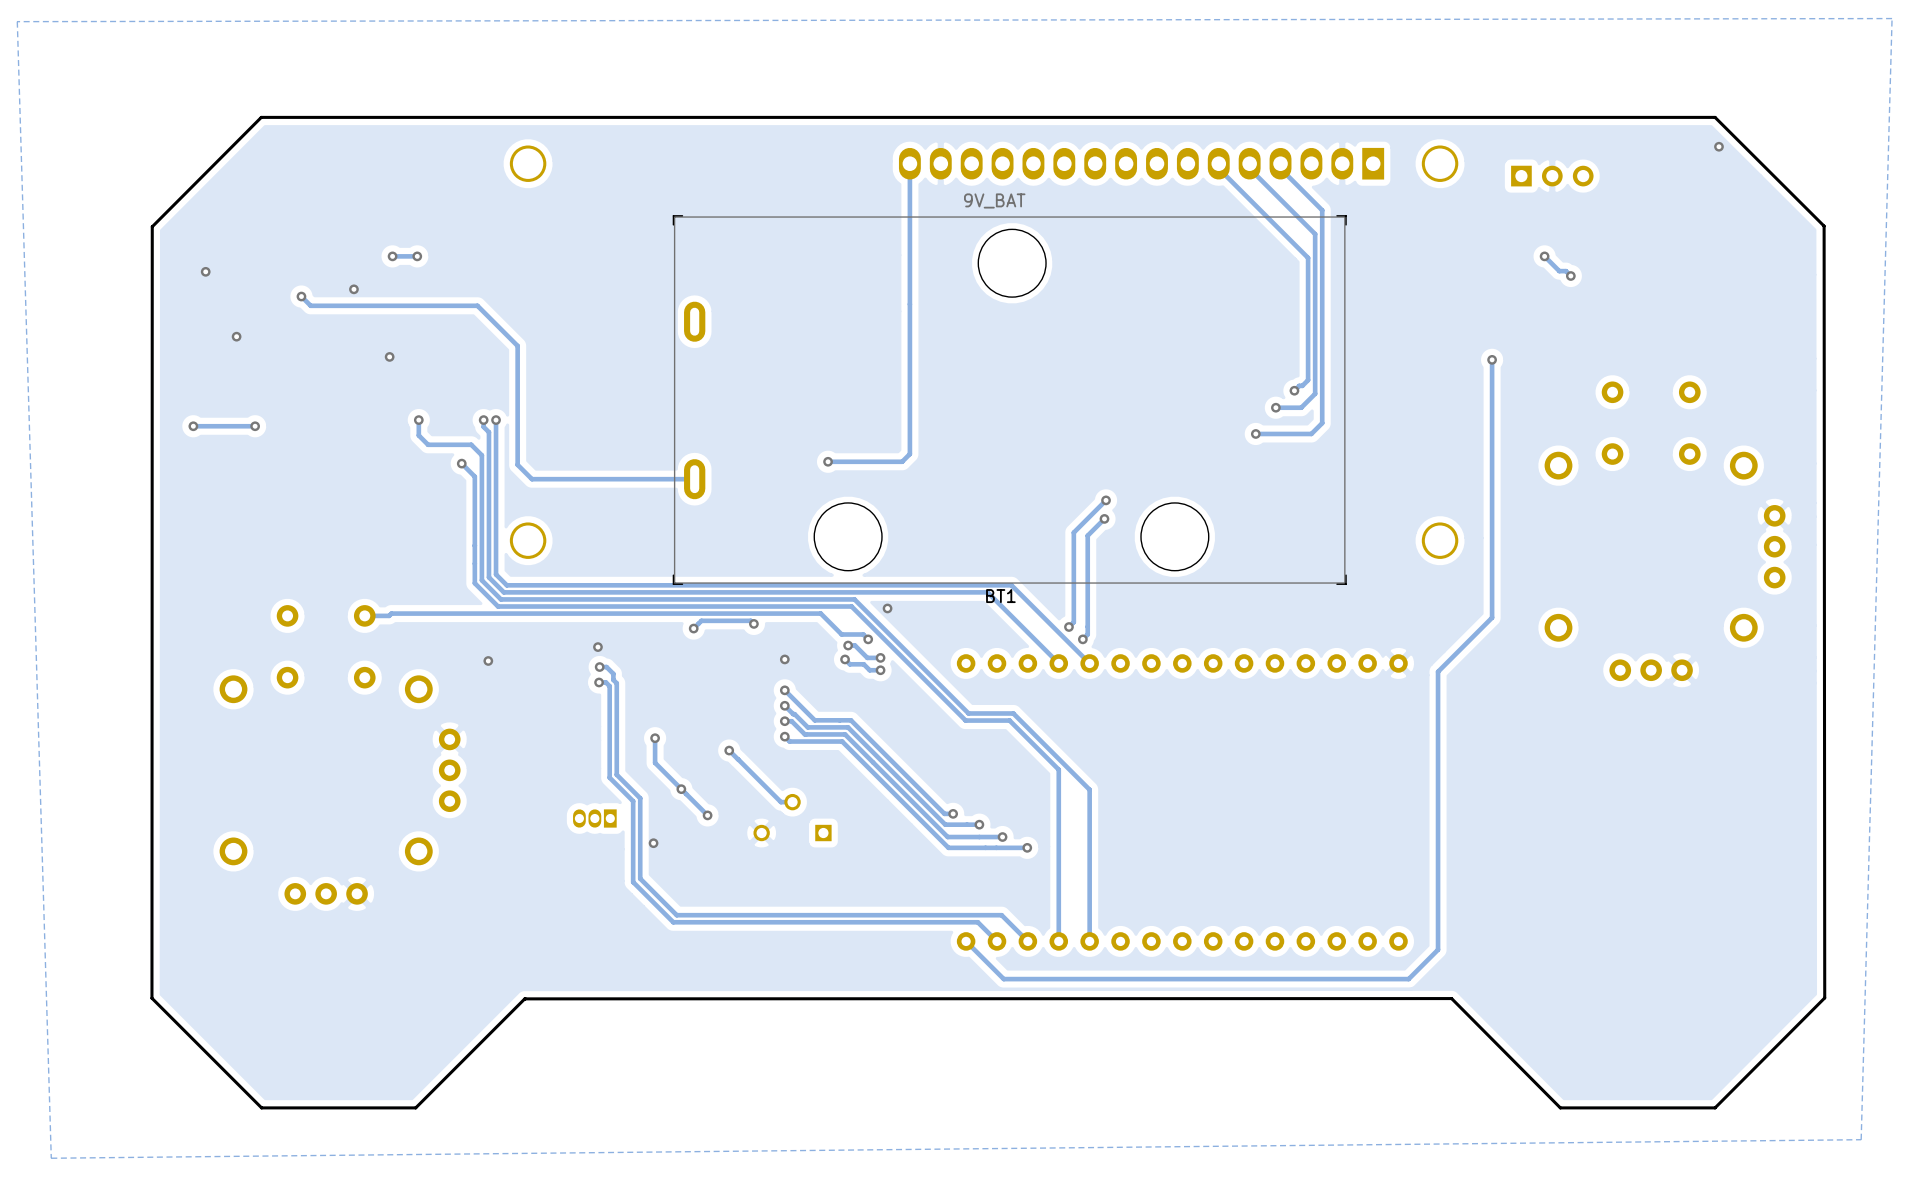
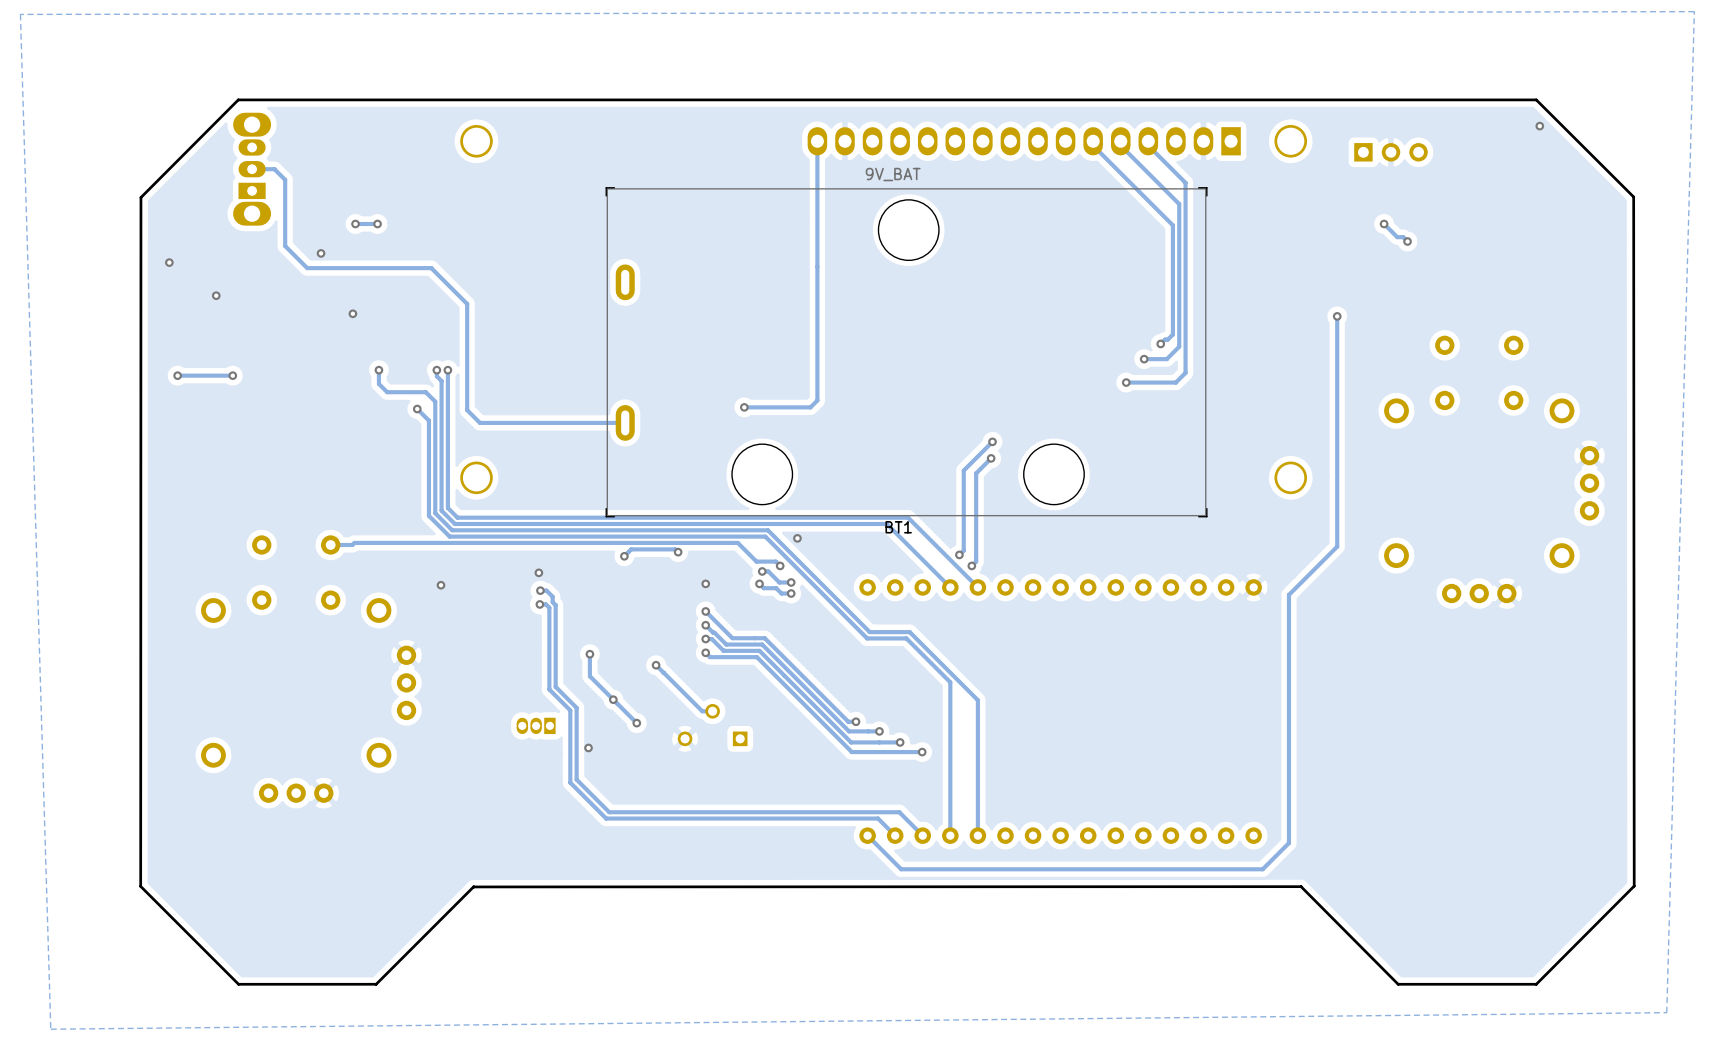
part: none -> (252, 169)
via position: (205, 271) -> (169, 262)
track: (301, 296) (310, 305) (338, 305) -> (252, 169) (274, 169) (285, 179) (285, 246) (307, 268)
via: (301, 296) -> none

